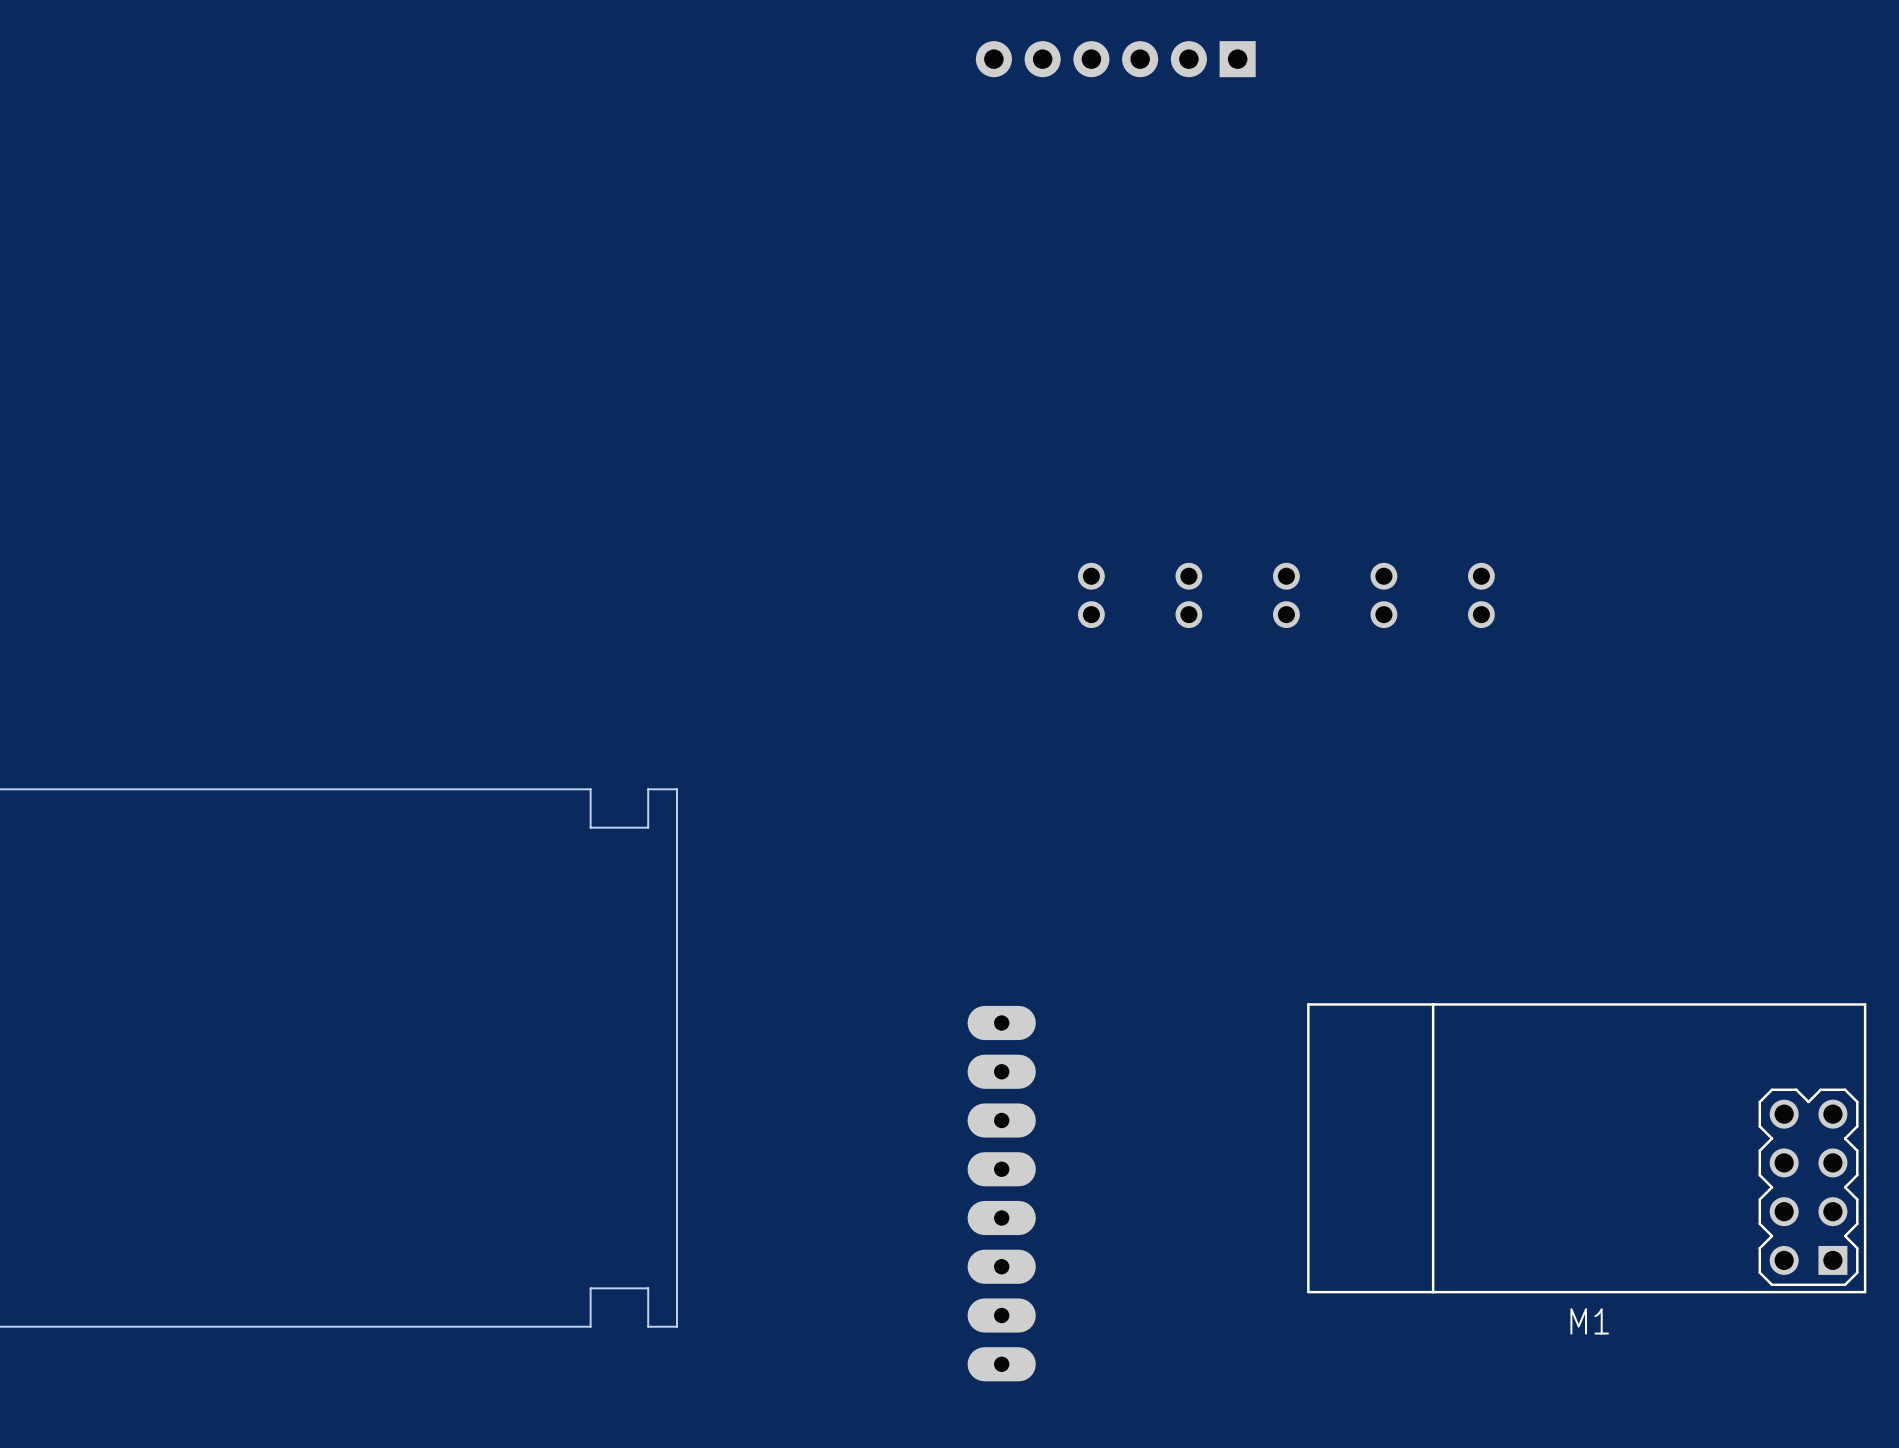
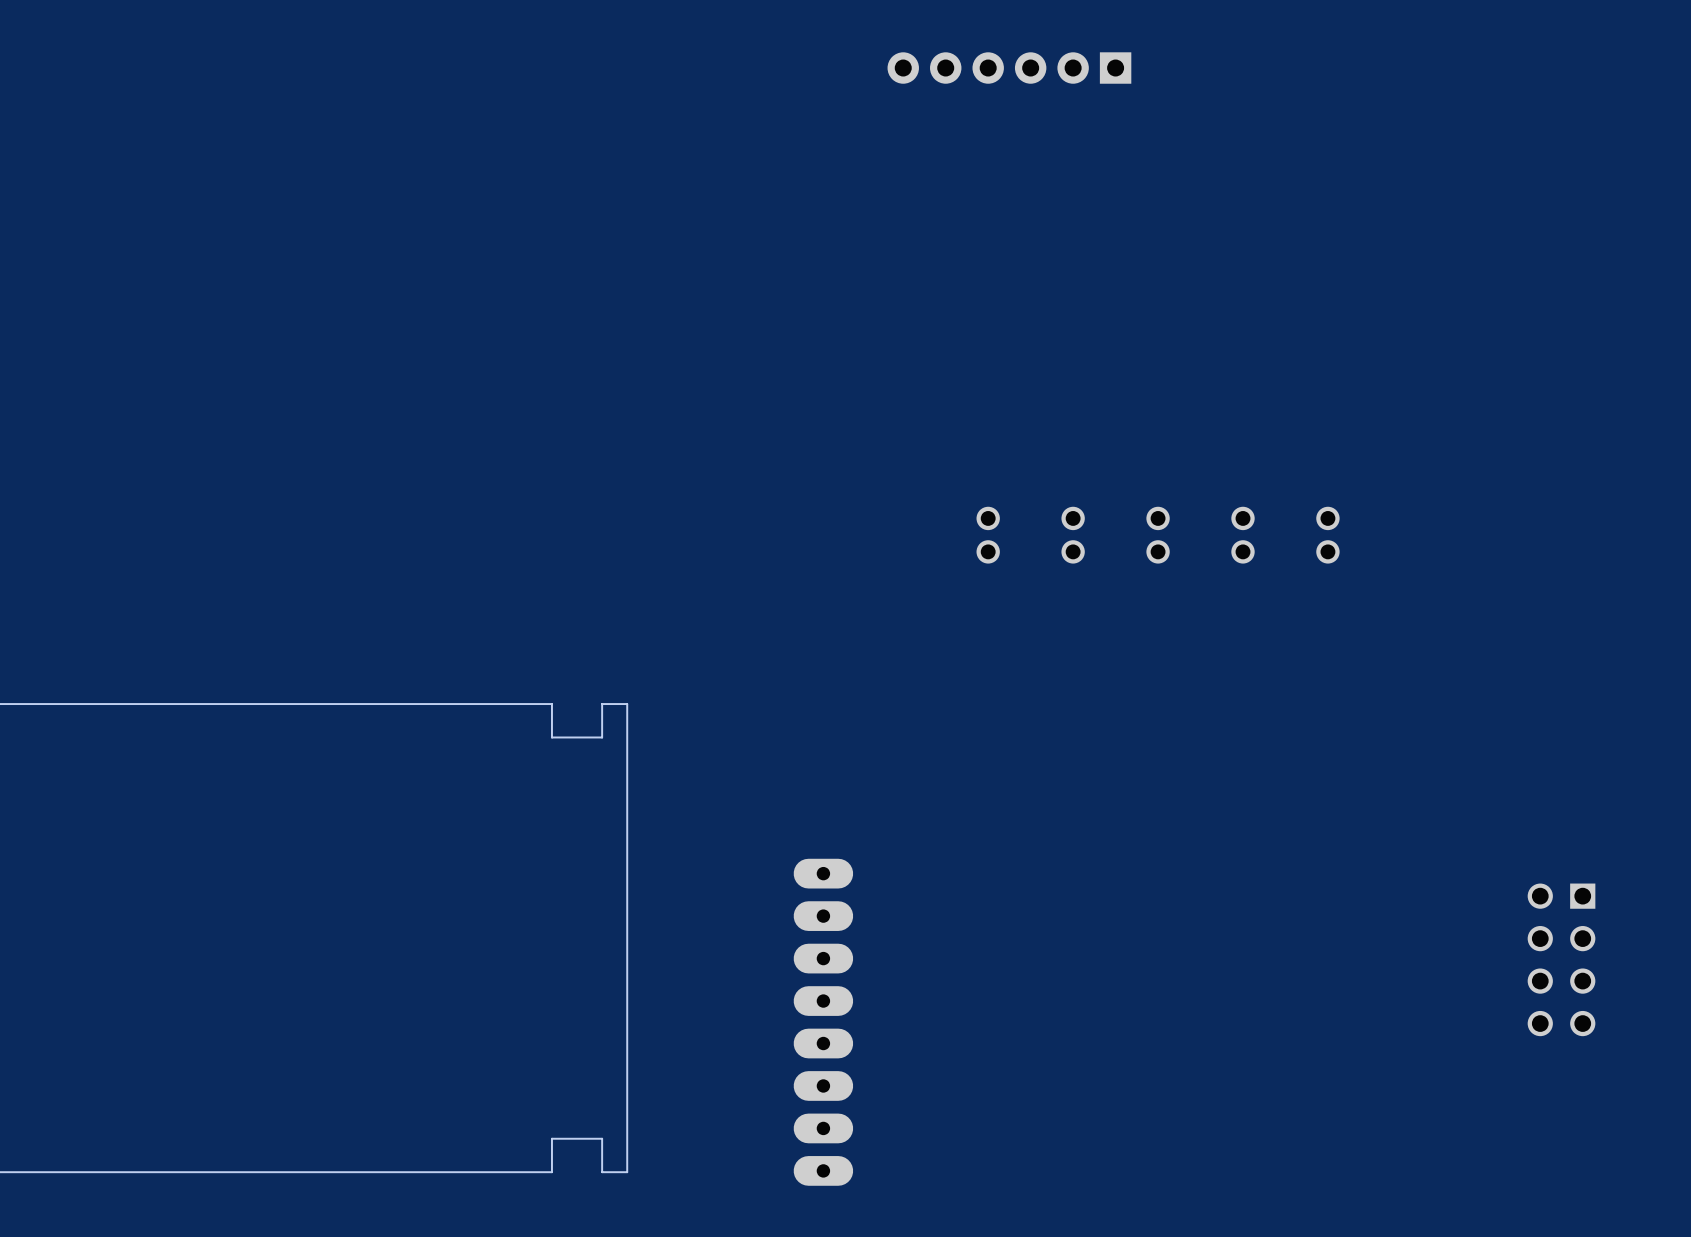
M1 side: bottom (1586, 1148) -> top (1561, 959)
part position: (1001, 1193) -> (823, 1022)

